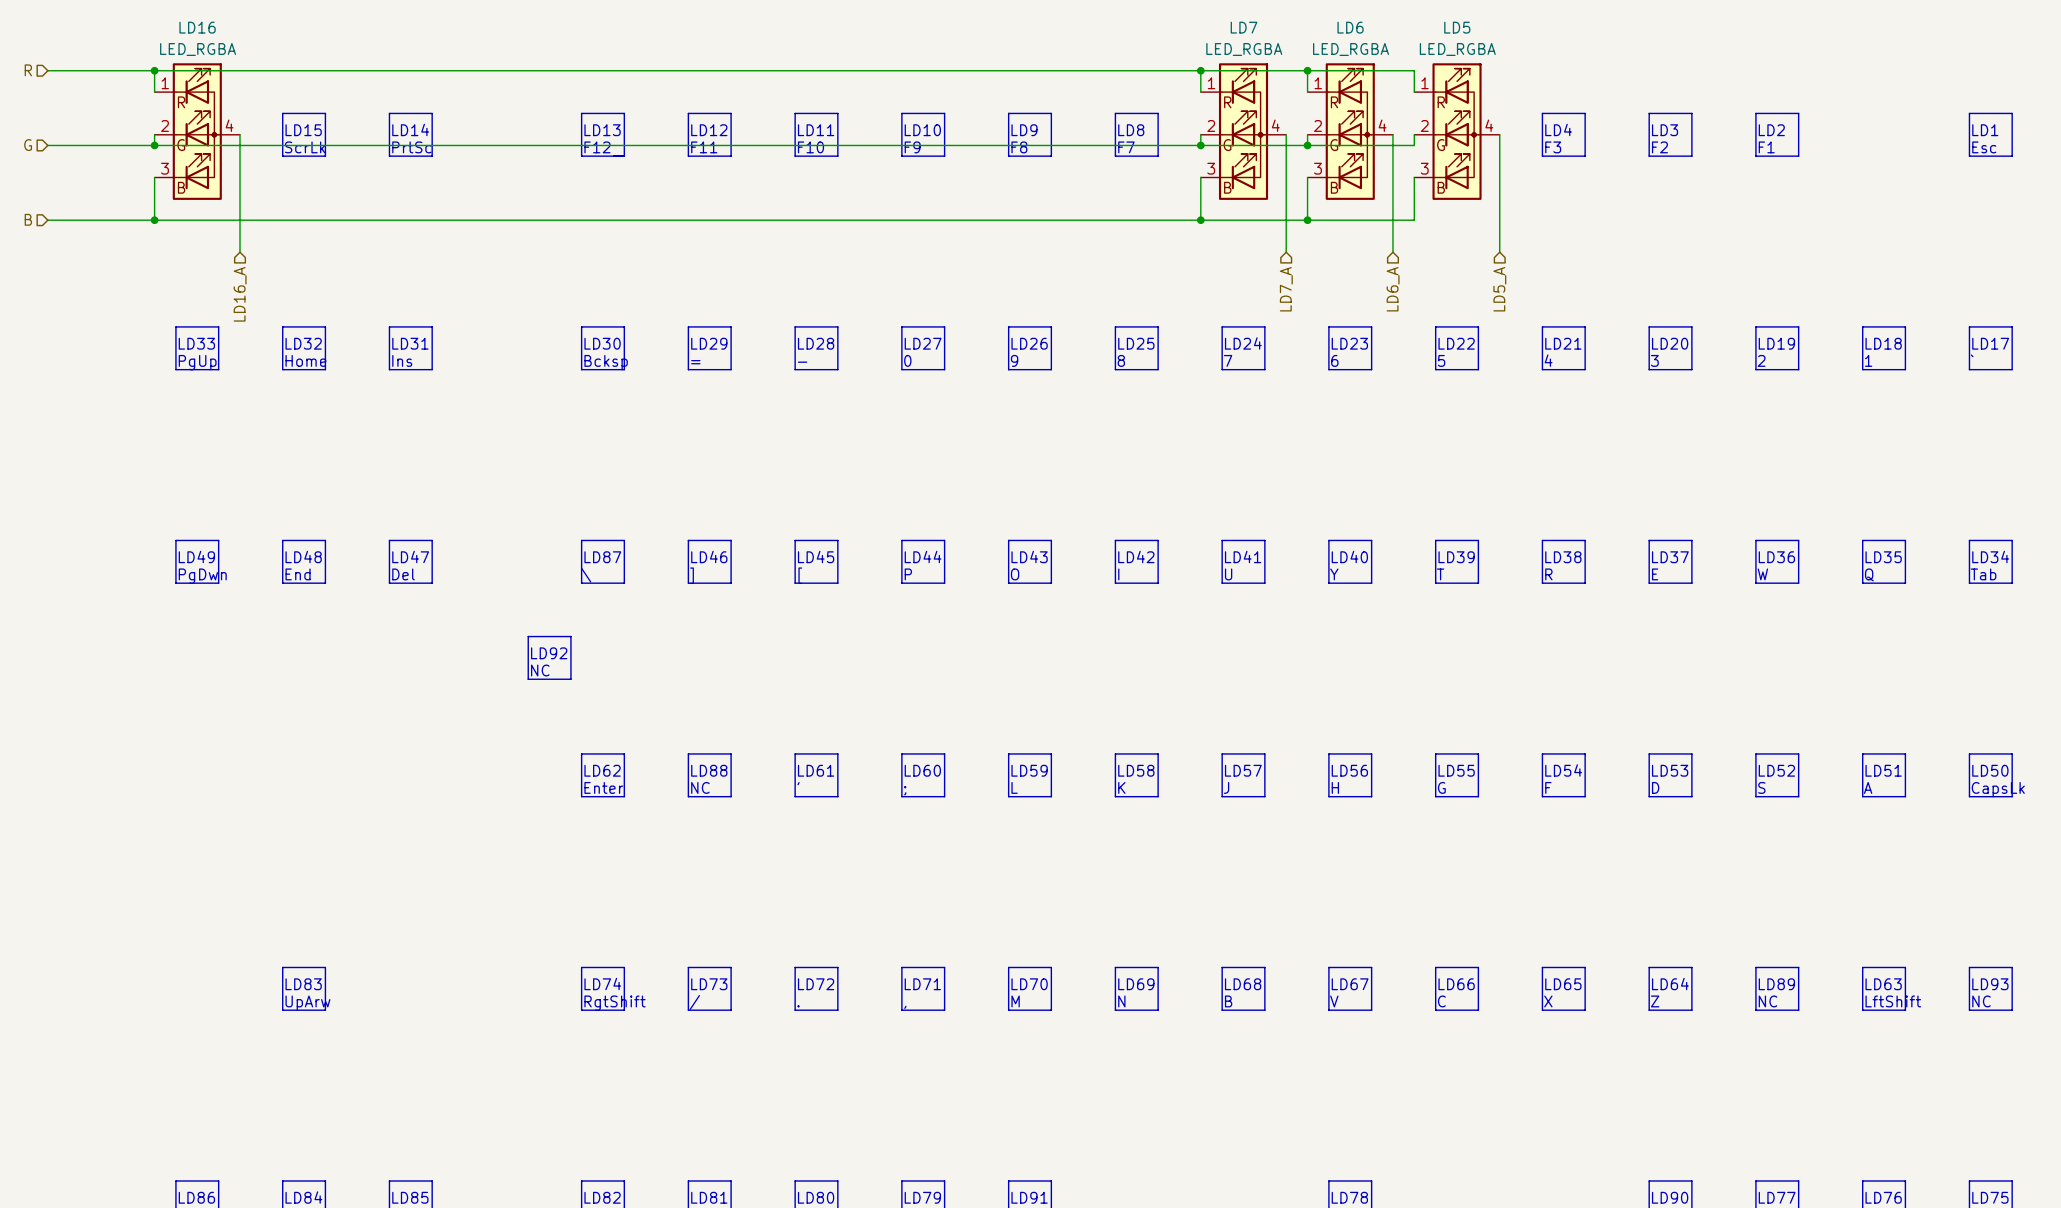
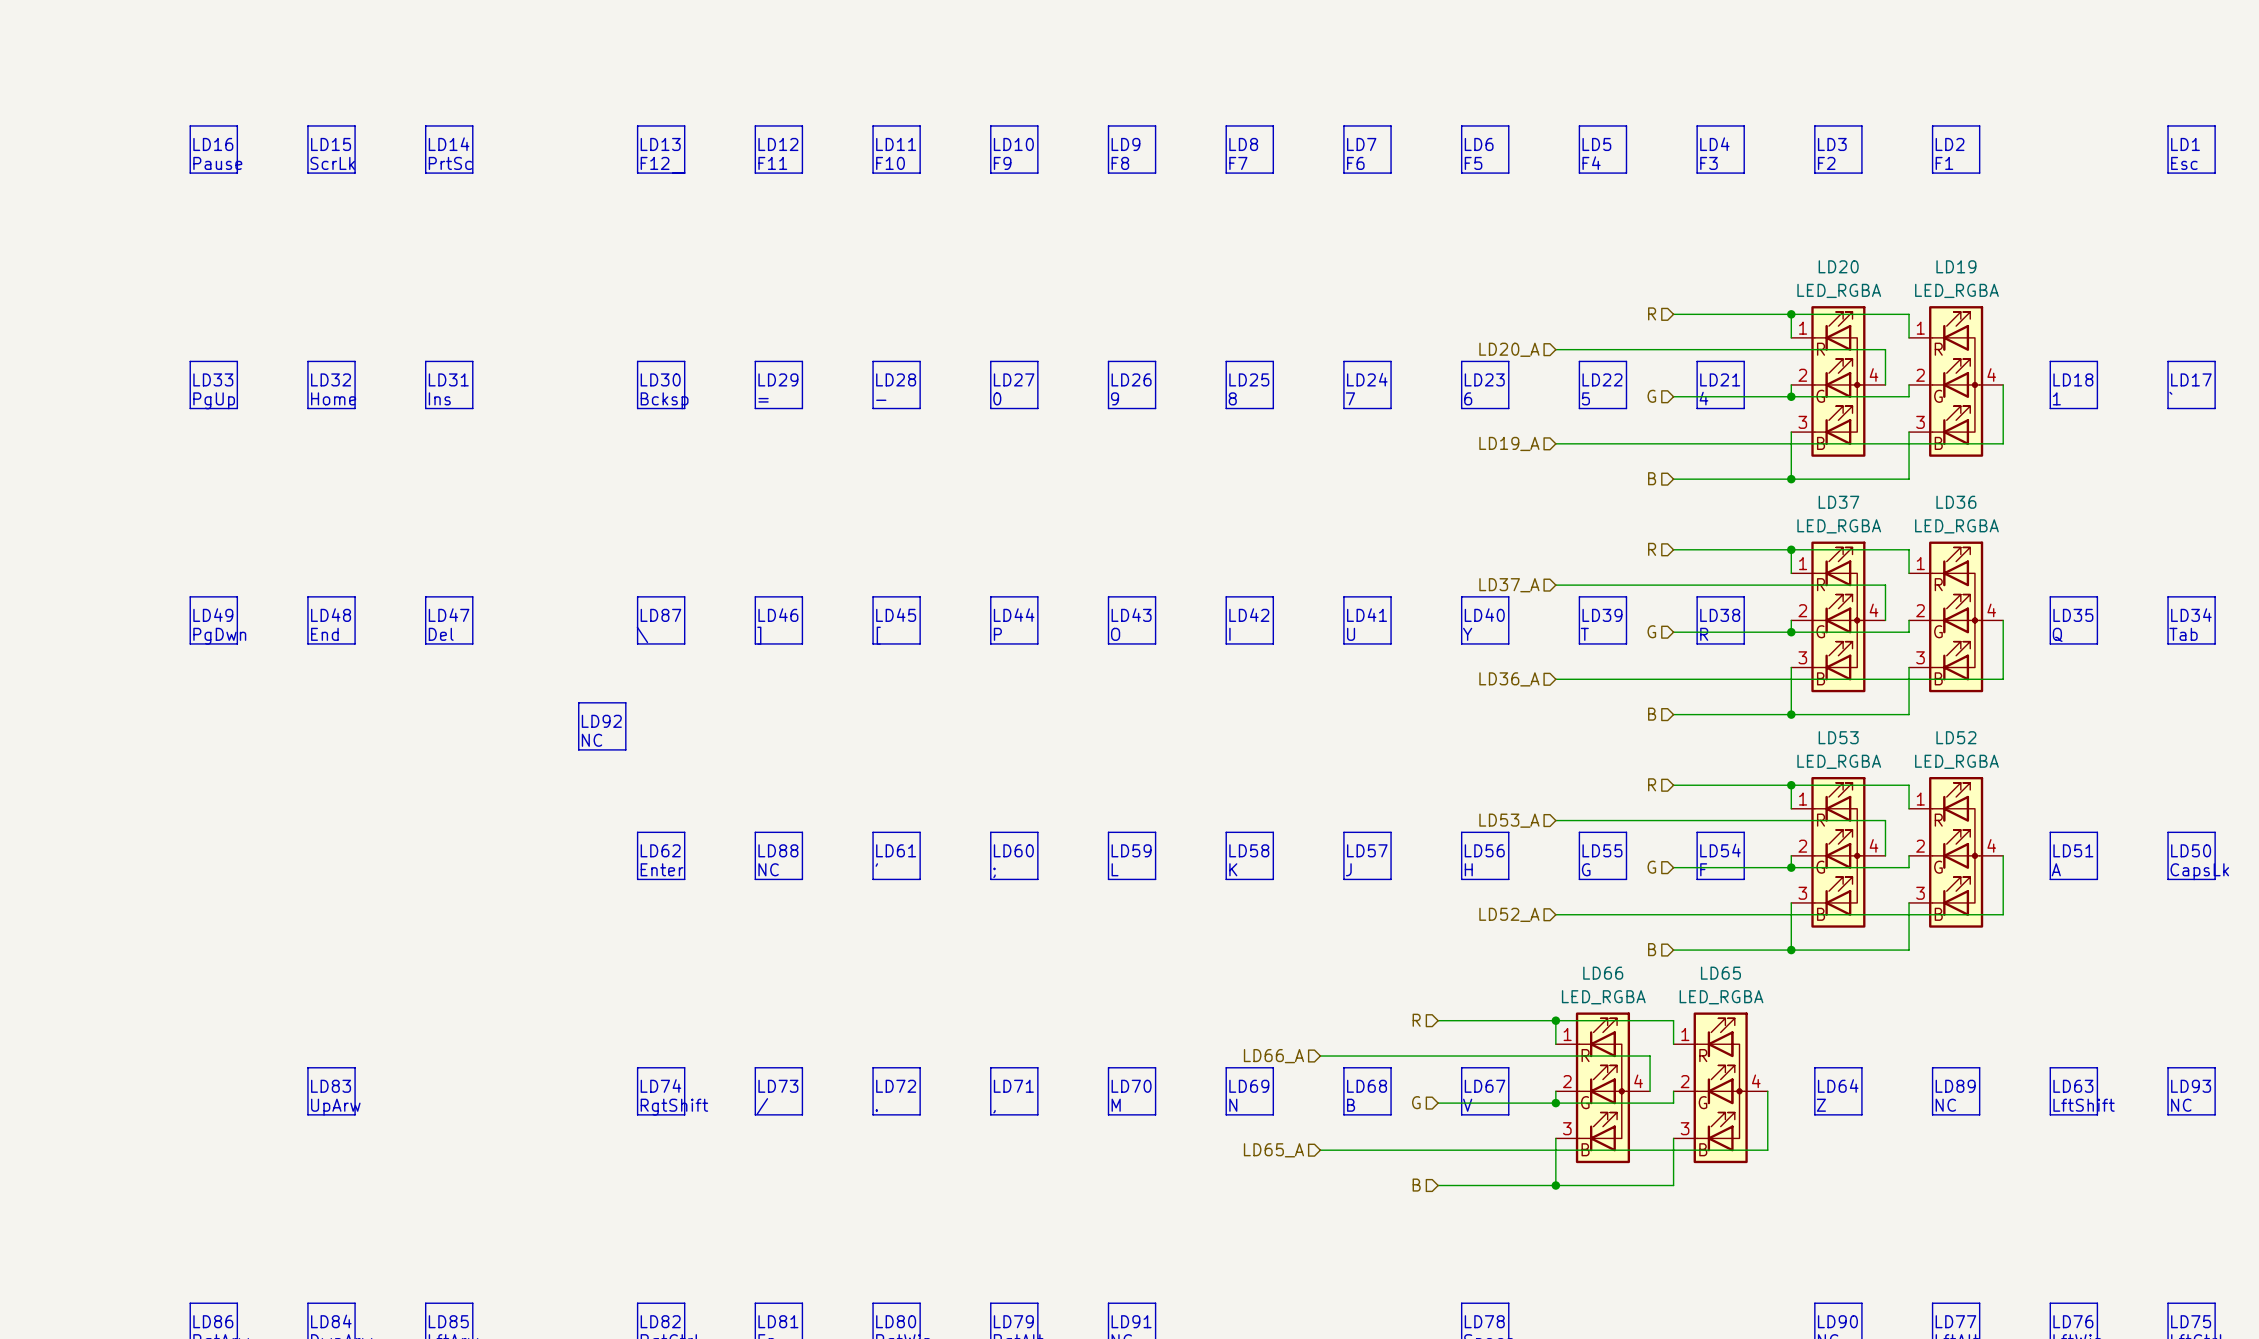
hierarchical label: R (28, 70) -> none
wire: (47, 70) (1414, 70) (1414, 92) -> none
wire: (154, 70) (154, 92) -> none
junction: (154, 70) -> none
wire: (1200, 70) (1200, 92) -> none
junction: (1200, 70) -> none
wire: (1307, 70) (1307, 92) -> none
junction: (1307, 70) -> none
line: none -> (190, 125) (237, 125) (237, 173) (190, 173) (190, 125)
line: none -> (1343, 125) (1391, 125) (1391, 173) (1343, 173) (1343, 125)
line: none -> (1461, 125) (1508, 125) (1508, 173) (1461, 173) (1461, 125)
line: none -> (1579, 125) (1579, 173) (1626, 173) (1626, 125) (1579, 125)
text: none -> LD16 (213, 144)
text: none -> LD7 (1361, 144)
text: none -> LD6 (1479, 144)
text: none -> LD5 (1596, 144)
LD16: LED_RGBA (197, 131) -> none
LD7: LED_RGBA (1243, 131) -> none
LD6: LED_RGBA (1350, 131) -> none
LD5: LED_RGBA (1457, 131) -> none
wire: (154, 134) (154, 145) -> none
wire: (240, 134) (240, 252) -> none
wire: (1200, 134) (1200, 145) -> none
wire: (1286, 134) (1286, 252) -> none
wire: (1307, 134) (1307, 145) -> none
wire: (1392, 134) (1392, 252) -> none
wire: (1414, 134) (1414, 145) (47, 145) -> none
wire: (1499, 134) (1499, 252) -> none
hierarchical label: G (28, 145) -> none
junction: (154, 145) -> none
junction: (1200, 145) -> none
junction: (1307, 145) -> none
text: none -> Pause (217, 163)
text: none -> F6 (1355, 163)
text: none -> F5 (1473, 163)
text: none -> F4 (1591, 163)
wire: (154, 177) (154, 220) -> none
wire: (1200, 177) (1200, 220) -> none
wire: (1307, 177) (1307, 220) -> none
wire: (1414, 177) (1414, 220) (47, 220) -> none
hierarchical label: B (28, 219) -> none
junction: (154, 220) -> none
junction: (1200, 220) -> none
junction: (1307, 220) -> none
hierarchical label: none -> R (1652, 313)
wire: none -> (1673, 314) (1909, 314) (1909, 337)
wire: none -> (1791, 314) (1791, 337)
junction: none -> (1791, 314)
hierarchical label: LD7_A (1286, 289) -> none
hierarchical label: LD6_A (1393, 289) -> LD20_A (1509, 349)
hierarchical label: LD5_A (1499, 289) -> none
hierarchical label: LD16_A (240, 294) -> none
wire: none -> (1555, 349) (1885, 349) (1885, 384)
line: (1649, 326) (1691, 326) (1691, 369) (1649, 369) (1649, 326) -> none
line: (1755, 326) (1798, 326) (1798, 369) (1755, 369) (1755, 326) -> none
text: LD20 (1670, 343) -> none
text: LD19 (1776, 343) -> none
LD20: none -> LED_RGBA (1838, 381)
LD19: none -> LED_RGBA (1956, 381)
wire: none -> (1791, 384) (1791, 396)
wire: none -> (1909, 384) (1909, 396) (1673, 396)
wire: none -> (2003, 384) (2003, 443) (1555, 443)
hierarchical label: none -> G (1651, 396)
junction: none -> (1791, 396)
text: 3 (1654, 360) -> none
text: 2 (1761, 360) -> none
wire: none -> (1791, 432) (1791, 479)
wire: none -> (1909, 432) (1909, 479) (1673, 479)
hierarchical label: none -> LD19_A (1509, 443)
hierarchical label: none -> B (1652, 478)
junction: none -> (1791, 479)
hierarchical label: none -> R (1652, 549)
wire: none -> (1673, 549) (1909, 549) (1909, 573)
wire: none -> (1791, 549) (1791, 573)
junction: none -> (1791, 549)
hierarchical label: none -> LD37_A (1509, 585)
wire: none -> (1555, 585) (1885, 585) (1885, 620)
line: (1649, 540) (1691, 540) (1691, 583) (1649, 583) (1649, 540) -> none
line: (1755, 540) (1798, 540) (1798, 583) (1755, 583) (1755, 540) -> none
text: LD37 (1670, 557) -> none
text: LD36 (1776, 557) -> none
LD37: none -> LED_RGBA (1838, 616)
LD36: none -> LED_RGBA (1956, 616)
wire: none -> (1791, 620) (1791, 632)
wire: none -> (1909, 620) (1909, 632) (1673, 632)
wire: none -> (2003, 620) (2003, 679) (1555, 679)
hierarchical label: none -> G (1651, 631)
junction: none -> (1791, 632)
text: E (1655, 574) -> none
text: W (1762, 574) -> none
wire: none -> (1791, 667) (1791, 714)
wire: none -> (1909, 667) (1909, 714) (1673, 714)
hierarchical label: none -> LD36_A (1509, 679)
hierarchical label: none -> B (1652, 714)
junction: none -> (1791, 714)
hierarchical label: none -> R (1652, 784)
wire: none -> (1673, 785) (1909, 785) (1909, 808)
wire: none -> (1791, 785) (1791, 808)
junction: none -> (1791, 785)
hierarchical label: none -> LD53_A (1509, 820)
wire: none -> (1555, 820) (1885, 820) (1885, 855)
line: (1649, 753) (1691, 753) (1691, 796) (1649, 796) (1649, 753) -> none
line: (1755, 753) (1798, 753) (1798, 796) (1755, 796) (1755, 753) -> none
text: LD53 (1670, 770) -> none
text: LD52 (1776, 770) -> none
LD53: none -> LED_RGBA (1838, 852)
LD52: none -> LED_RGBA (1956, 852)
wire: none -> (1791, 855) (1791, 867)
wire: none -> (1909, 855) (1909, 867) (1673, 867)
wire: none -> (2003, 855) (2003, 914) (1555, 914)
hierarchical label: none -> G (1651, 867)
junction: none -> (1791, 867)
text: D (1655, 787) -> none
text: S (1761, 787) -> none
wire: none -> (1791, 902) (1791, 950)
wire: none -> (1909, 902) (1909, 950) (1673, 950)
hierarchical label: none -> LD52_A (1509, 914)
hierarchical label: none -> B (1652, 949)
junction: none -> (1791, 950)
hierarchical label: none -> R (1416, 1020)
wire: none -> (1438, 1020) (1673, 1020) (1673, 1044)
wire: none -> (1555, 1020) (1555, 1044)
junction: none -> (1555, 1020)
hierarchical label: none -> LD66_A (1273, 1056)
wire: none -> (1320, 1056) (1650, 1056) (1650, 1091)
line: (1435, 967) (1478, 967) (1478, 1010) (1435, 1010) (1435, 967) -> none
line: (1542, 967) (1585, 967) (1585, 1010) (1542, 1010) (1542, 967) -> none
text: LD66 (1456, 984) -> none
text: LD65 (1563, 984) -> none
LD66: none -> LED_RGBA (1602, 1087)
LD65: none -> LED_RGBA (1720, 1087)
wire: none -> (1555, 1091) (1555, 1103)
wire: none -> (1673, 1091) (1673, 1103) (1438, 1103)
wire: none -> (1767, 1091) (1767, 1150) (1320, 1150)
hierarchical label: none -> G (1416, 1102)
junction: none -> (1555, 1103)
text: C (1441, 1001) -> none
text: X (1548, 1001) -> none
wire: none -> (1555, 1138) (1555, 1185)
wire: none -> (1673, 1138) (1673, 1185) (1438, 1185)
hierarchical label: none -> LD65_A (1273, 1150)
hierarchical label: none -> B (1416, 1185)
junction: none -> (1555, 1185)

